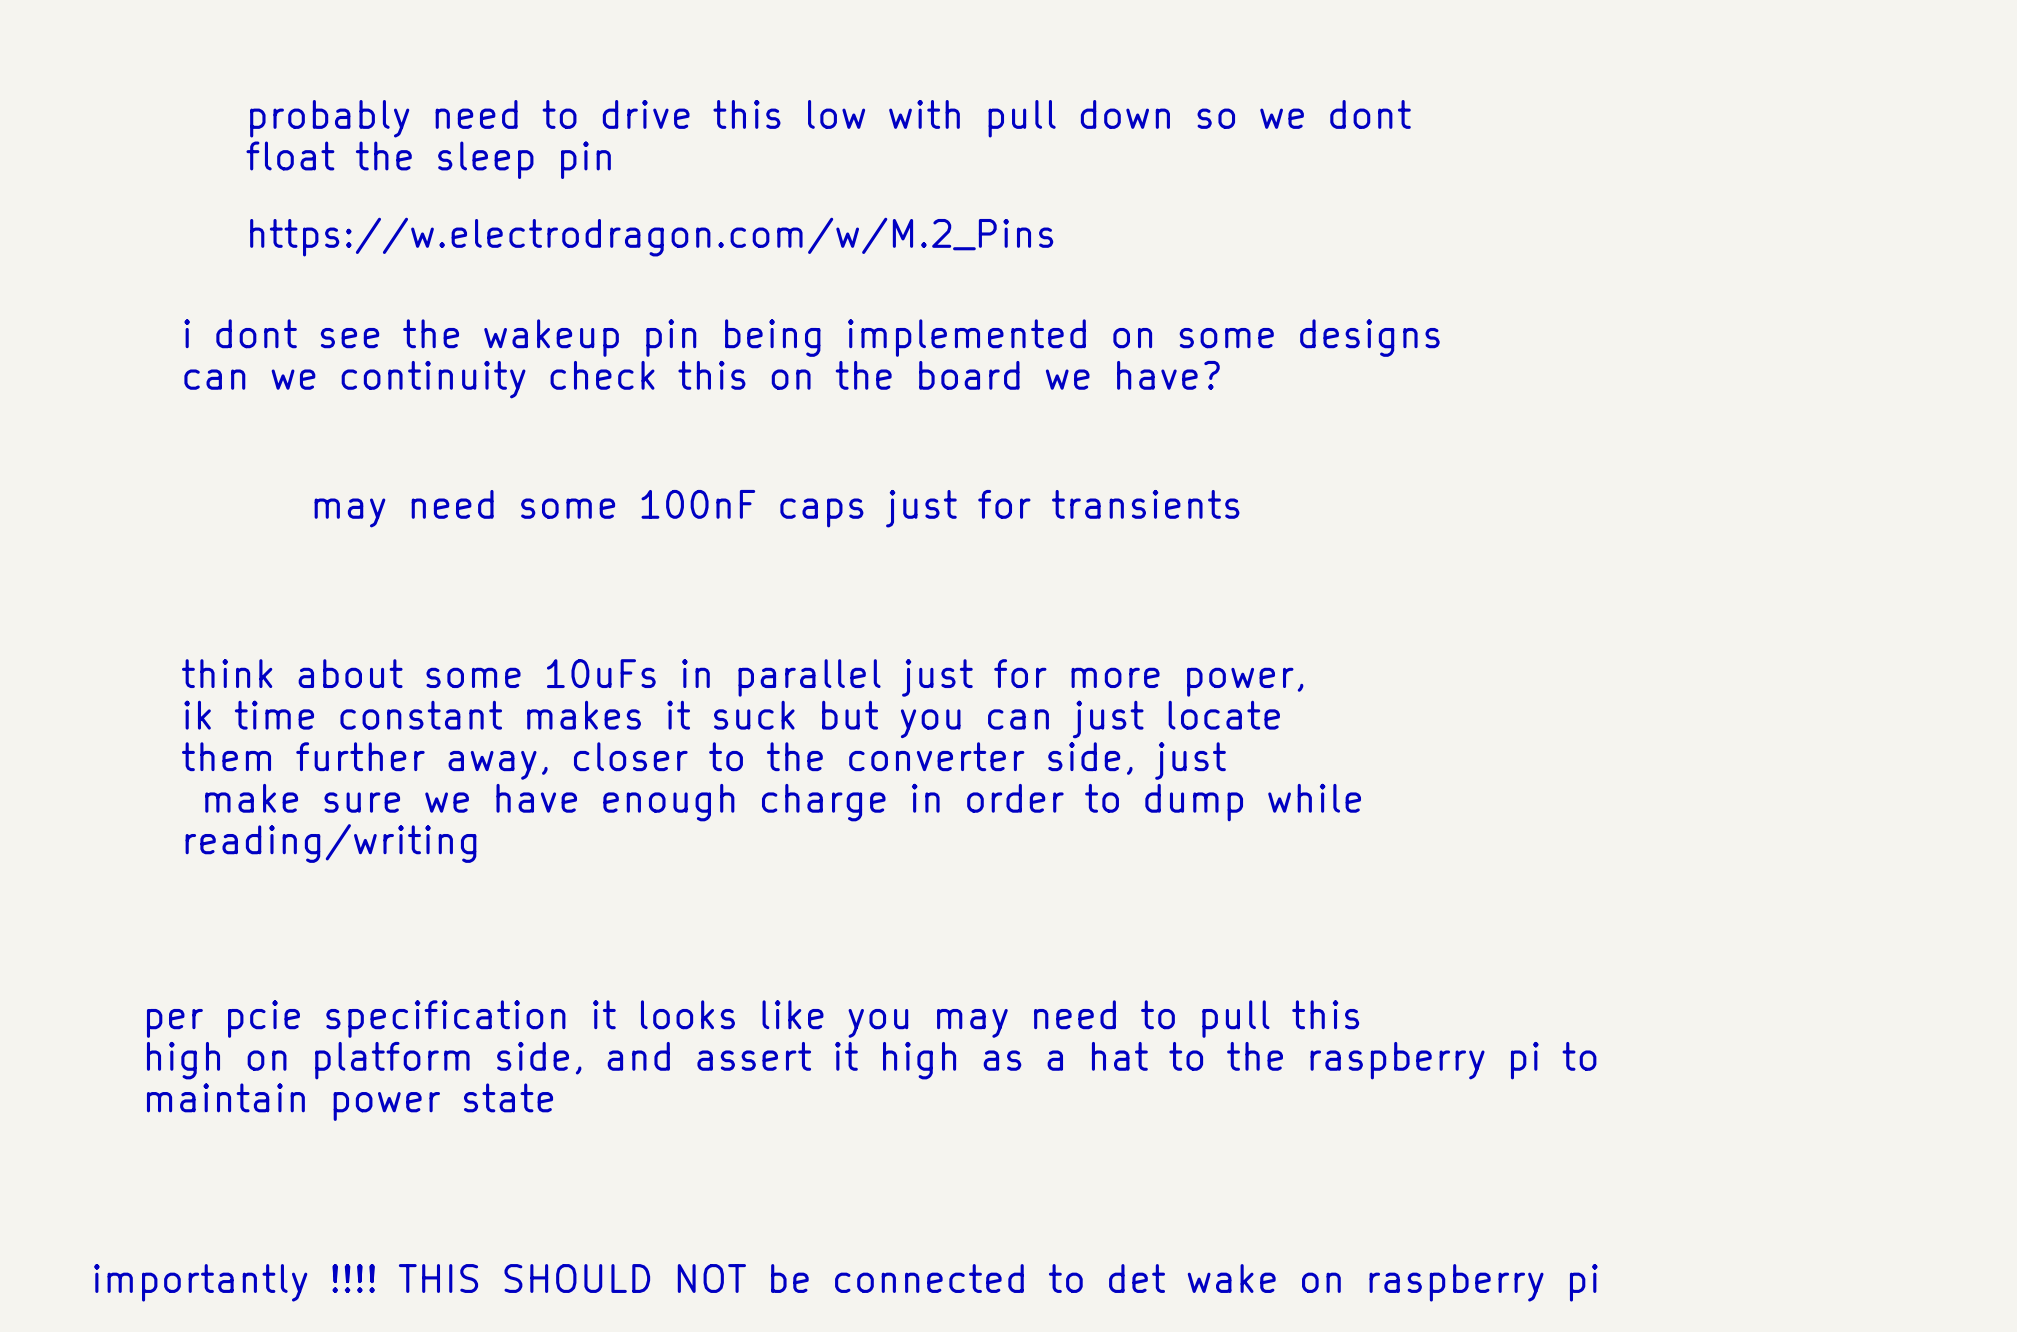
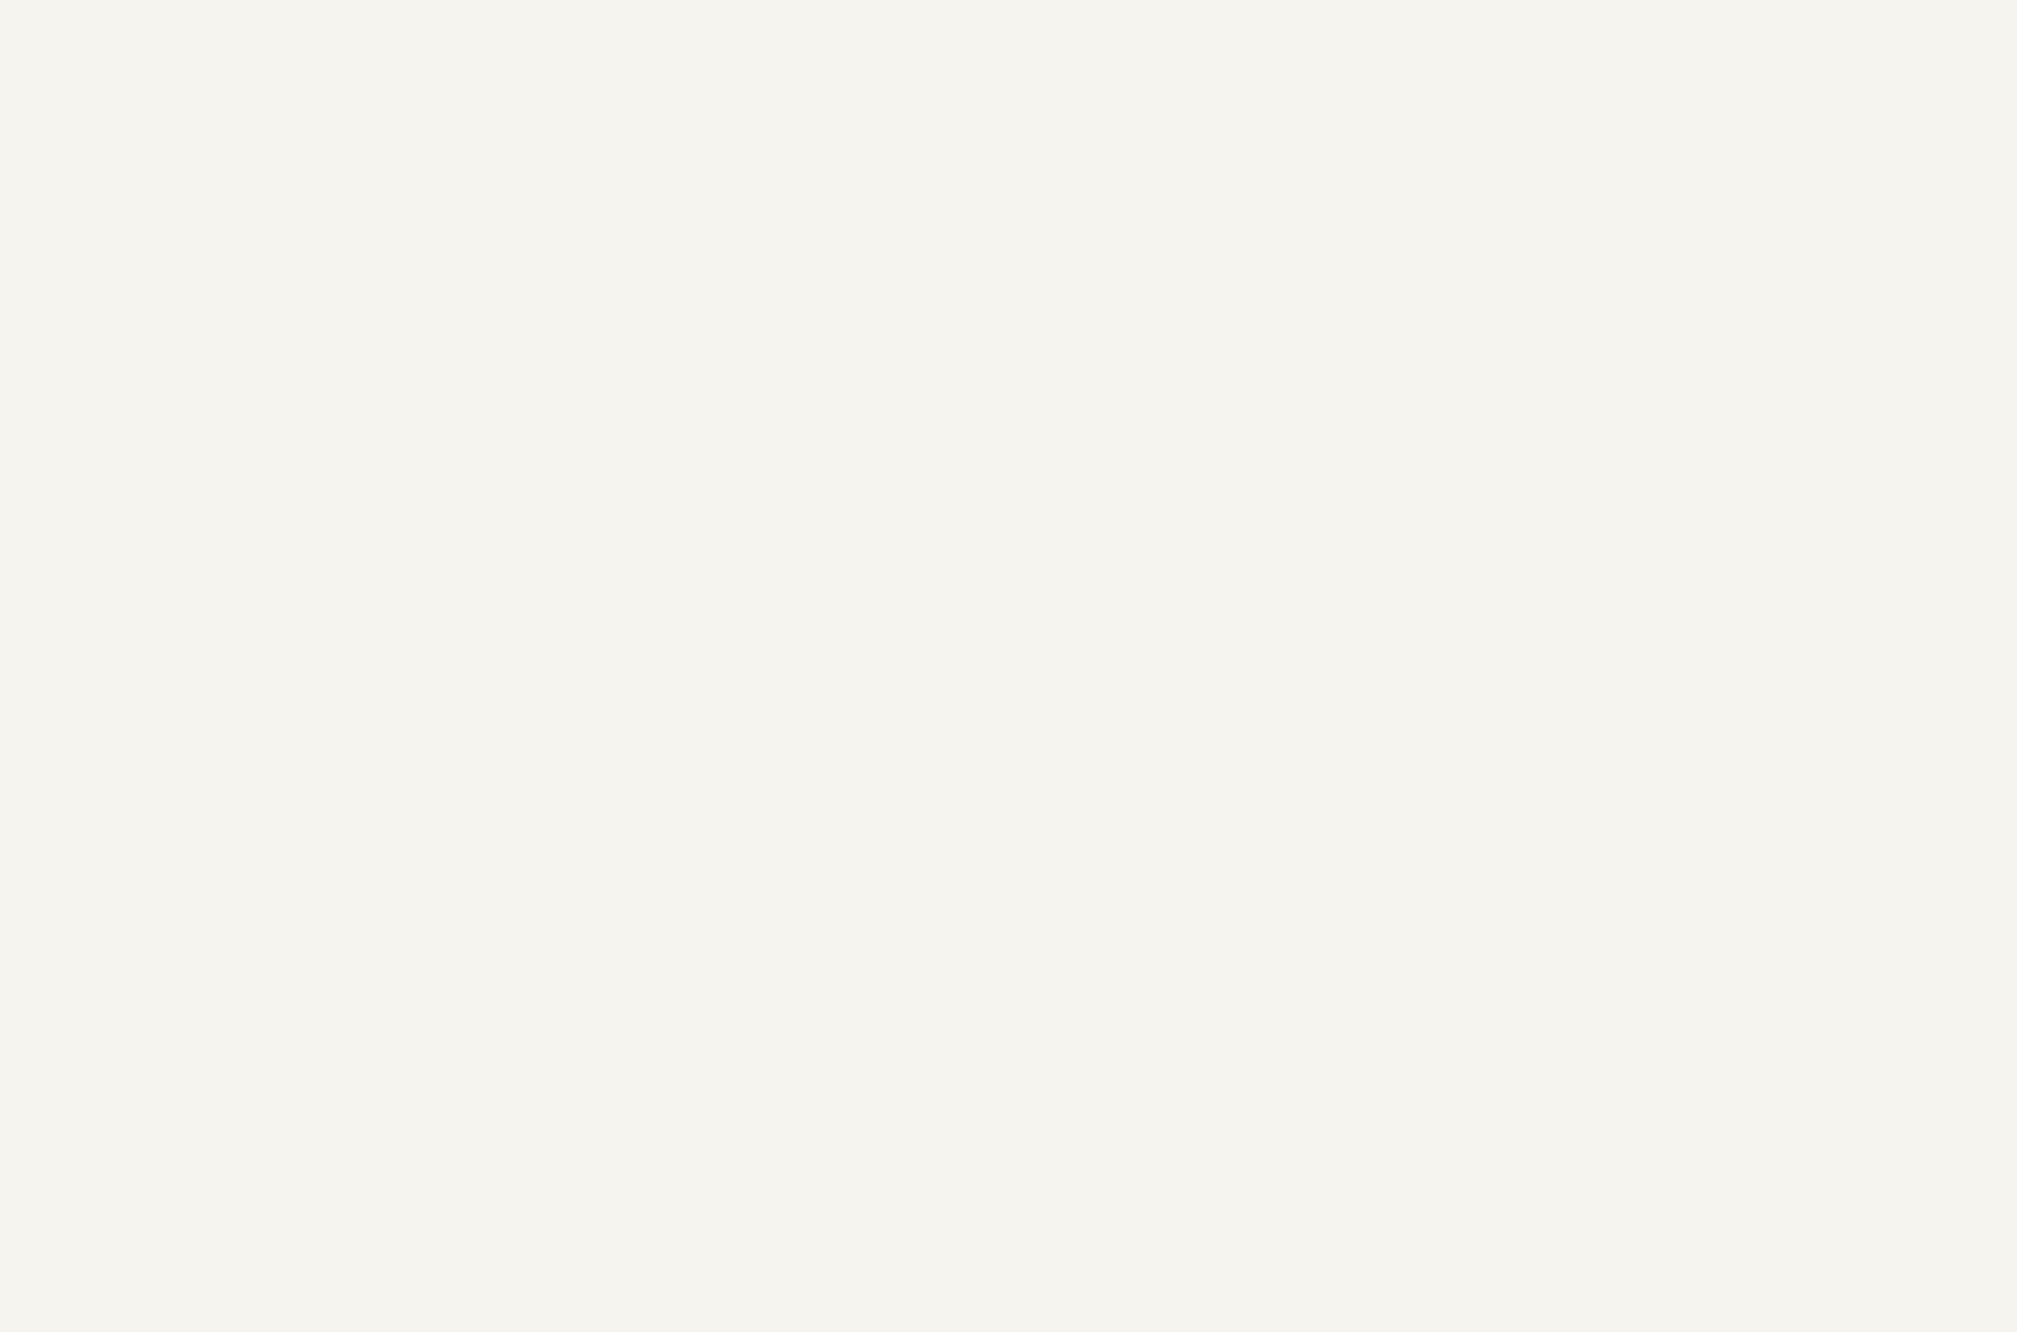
text: probably need to drive this low with pull down so we dont (830, 118) -> none
text: float the sleep pin (428, 160) -> none
text: https://w.electrodragon.com/w/M.2_Pins (651, 237) -> none
text: i dont see the wakeup pin being implemented on some designs (812, 338) -> none
text: can we continuity check this on the board we have? (702, 379) -> none
text: may need some 100nF caps just for transients (777, 508) -> none
text: think about some 10uFs in parallel just for more power, (742, 677) -> none
text: ik time constant makes it suck but you can just locate (732, 719) -> none
text: them further away, closer to the converter side, just (703, 761) -> none
text: make sure we have enough charge in order to dump while (783, 802) -> none
text: reading/writing (330, 843) -> none
text: per pcie specification it looks like you may need to pull this (753, 1019) -> none
text: high on platform side, and assert it high as a hat to the raspberry pi to (871, 1060) -> none
text: maintain power state (350, 1102) -> none
text: importantly !!!! THIS SHOULD NOT be connected to det wake on raspberry pi (845, 1282) -> none

